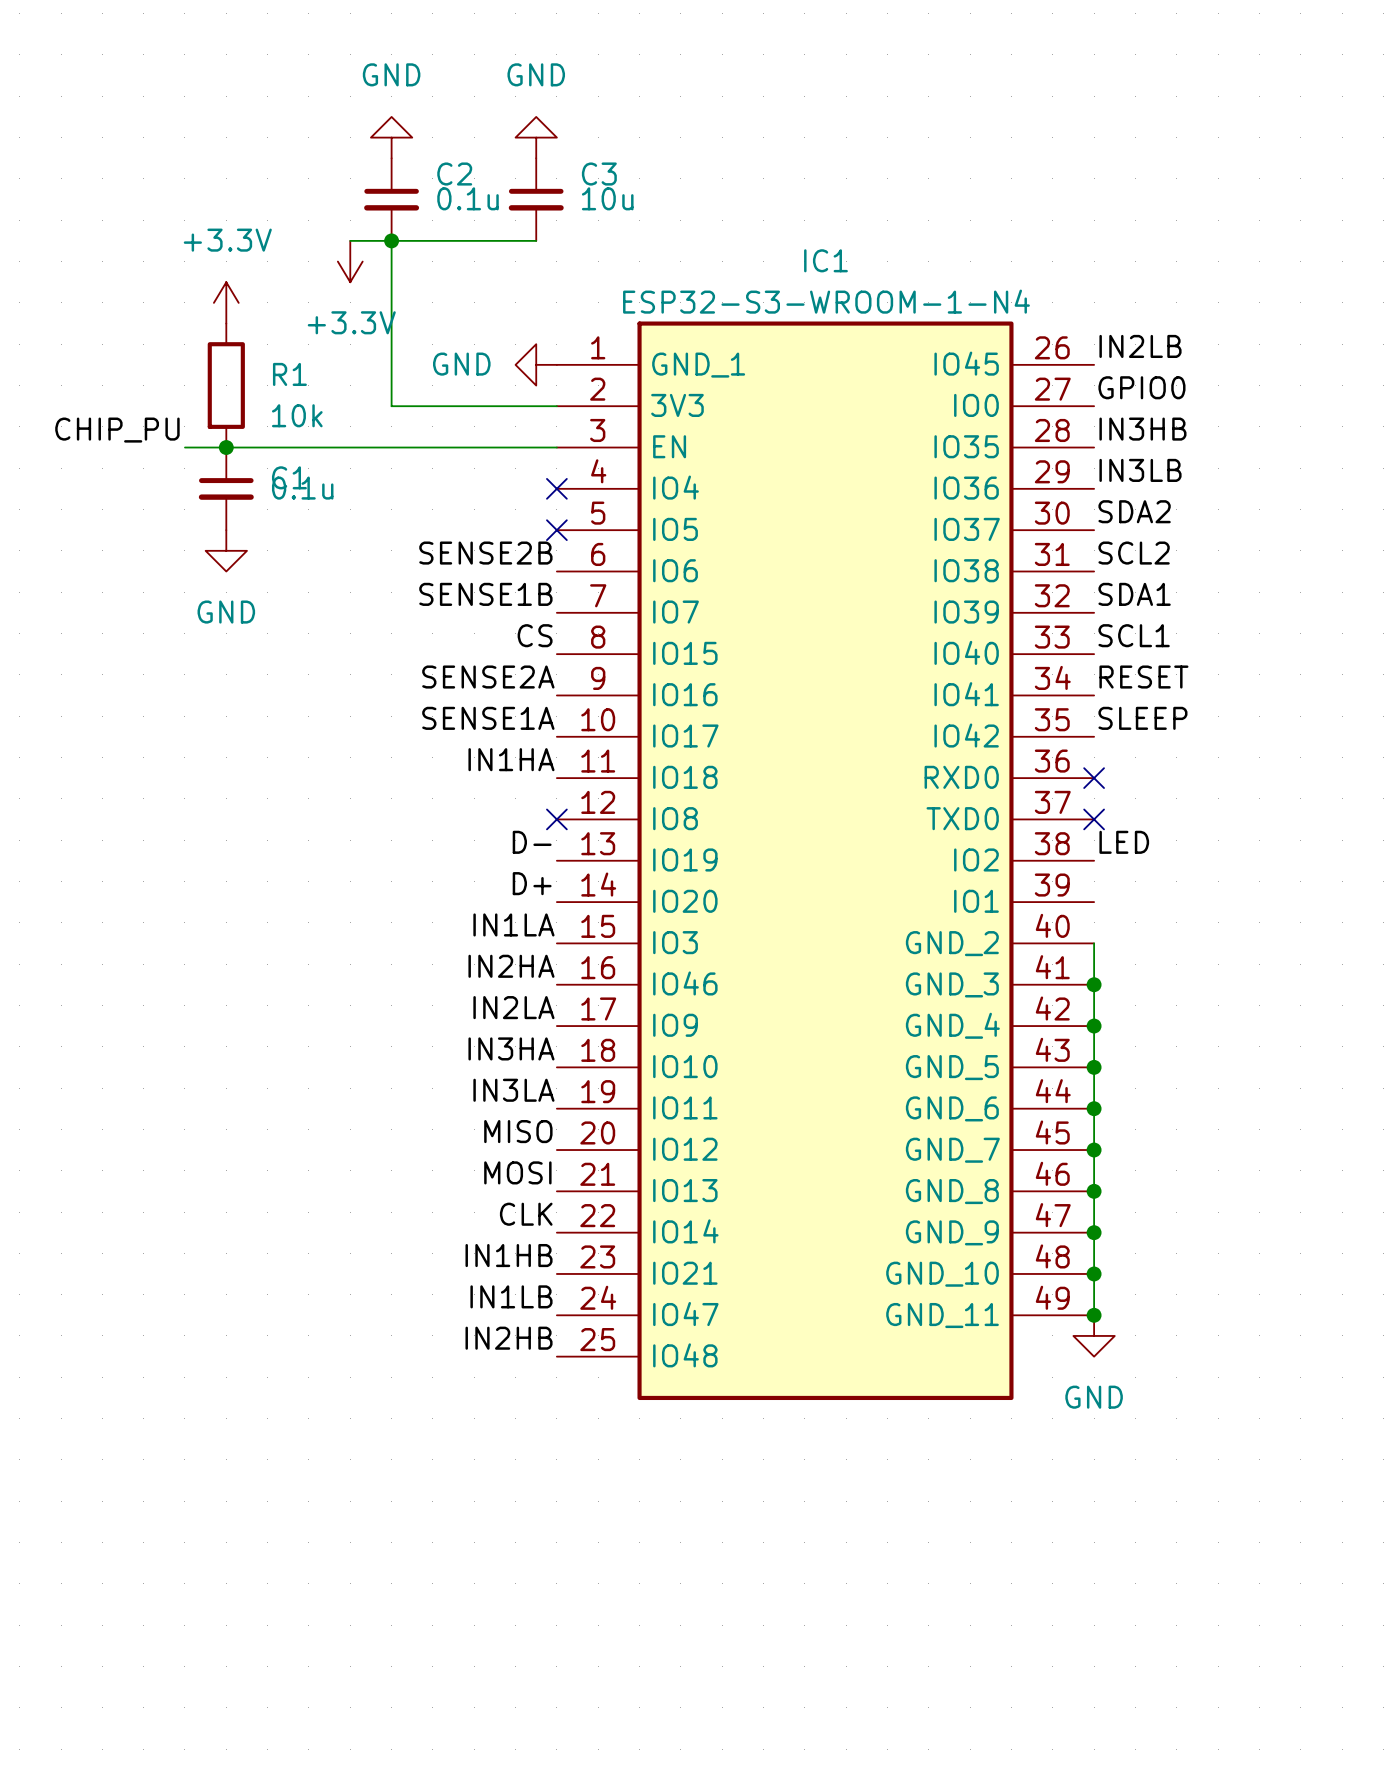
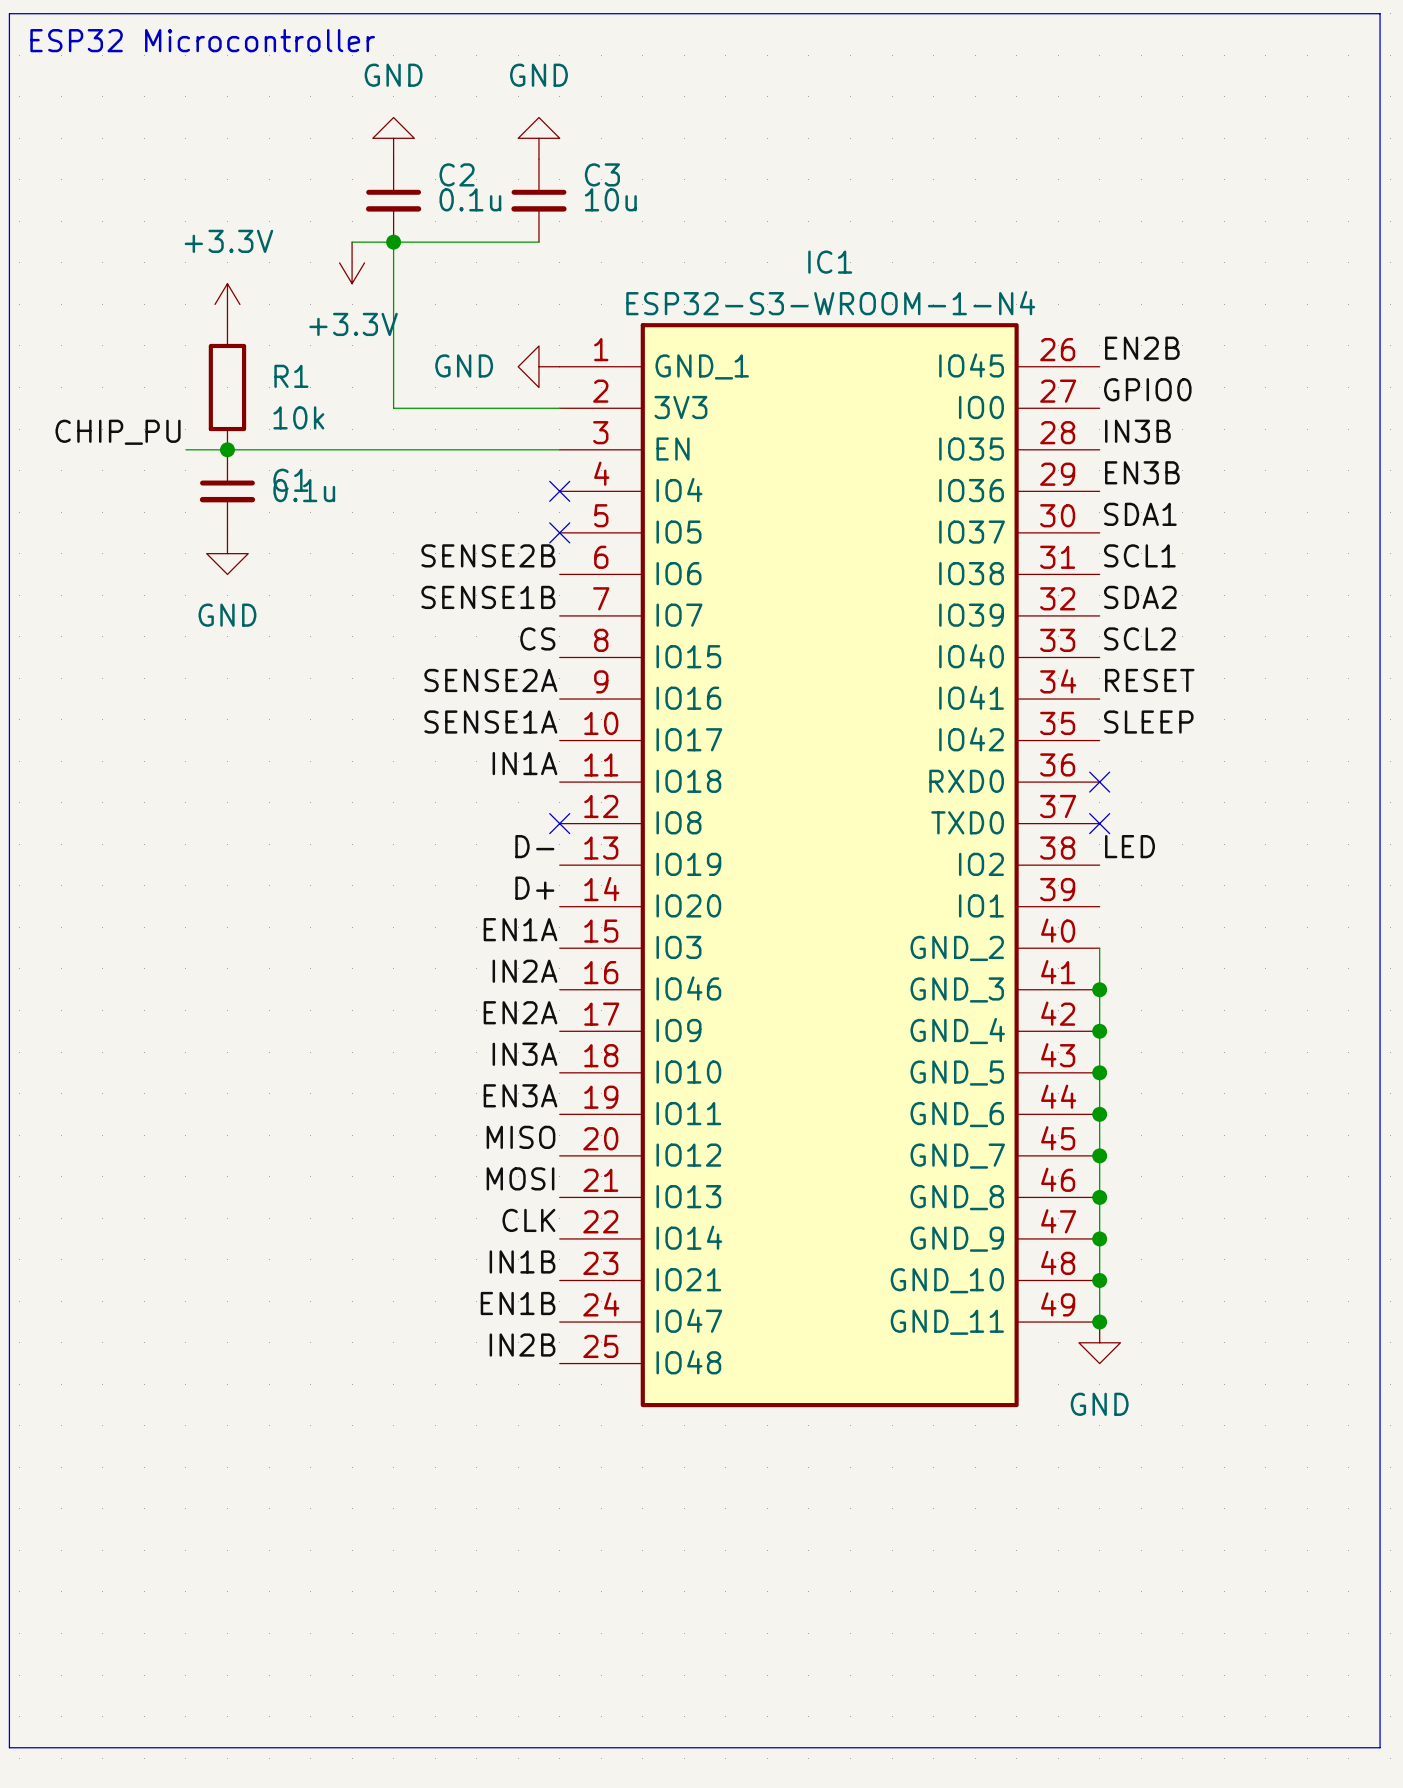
line: none -> (9, 13) (1380, 13) (1380, 1747) (9, 1747) (9, 13)
text: none -> ESP32 Microcontroller (202, 40)
label: IN2LB (1140, 346) -> EN2B (1142, 348)
label: IN3HB (1142, 429) -> IN3B (1137, 431)
label: IN3LB (1140, 470) -> EN3B (1142, 472)
label: SDA2 (1134, 511) -> SDA1 (1140, 514)
label: SCL2 (1134, 553) -> SCL1 (1139, 555)
label: SDA1 (1134, 594) -> SDA2 (1140, 597)
label: SCL1 (1134, 635) -> SCL2 (1139, 638)
label: IN1HA (511, 759) -> IN1A (524, 763)
label: IN1LA (513, 924) -> EN1A (520, 929)
label: IN2HA (511, 966) -> IN2A (524, 971)
label: IN2LA (513, 1007) -> EN2A (520, 1012)
label: IN3HA (511, 1048) -> IN3A (524, 1054)
label: IN3LA (513, 1090) -> EN3A (520, 1095)
label: IN1HB (509, 1255) -> IN1B (522, 1261)
label: IN1LB (511, 1296) -> EN1B (518, 1303)
label: IN2HB (509, 1338) -> IN2B (522, 1345)

